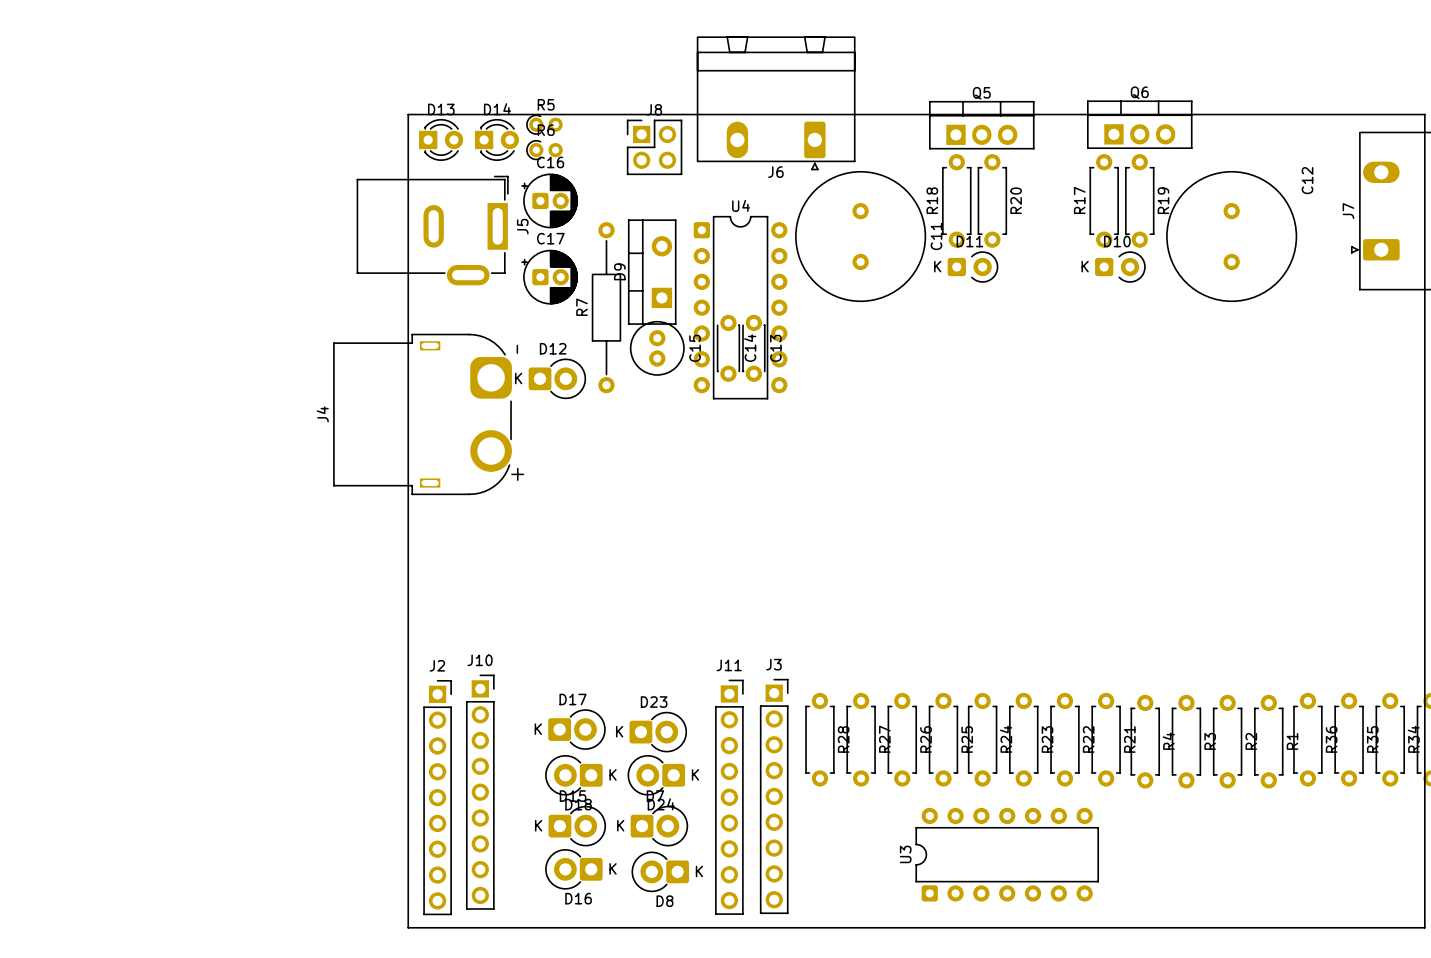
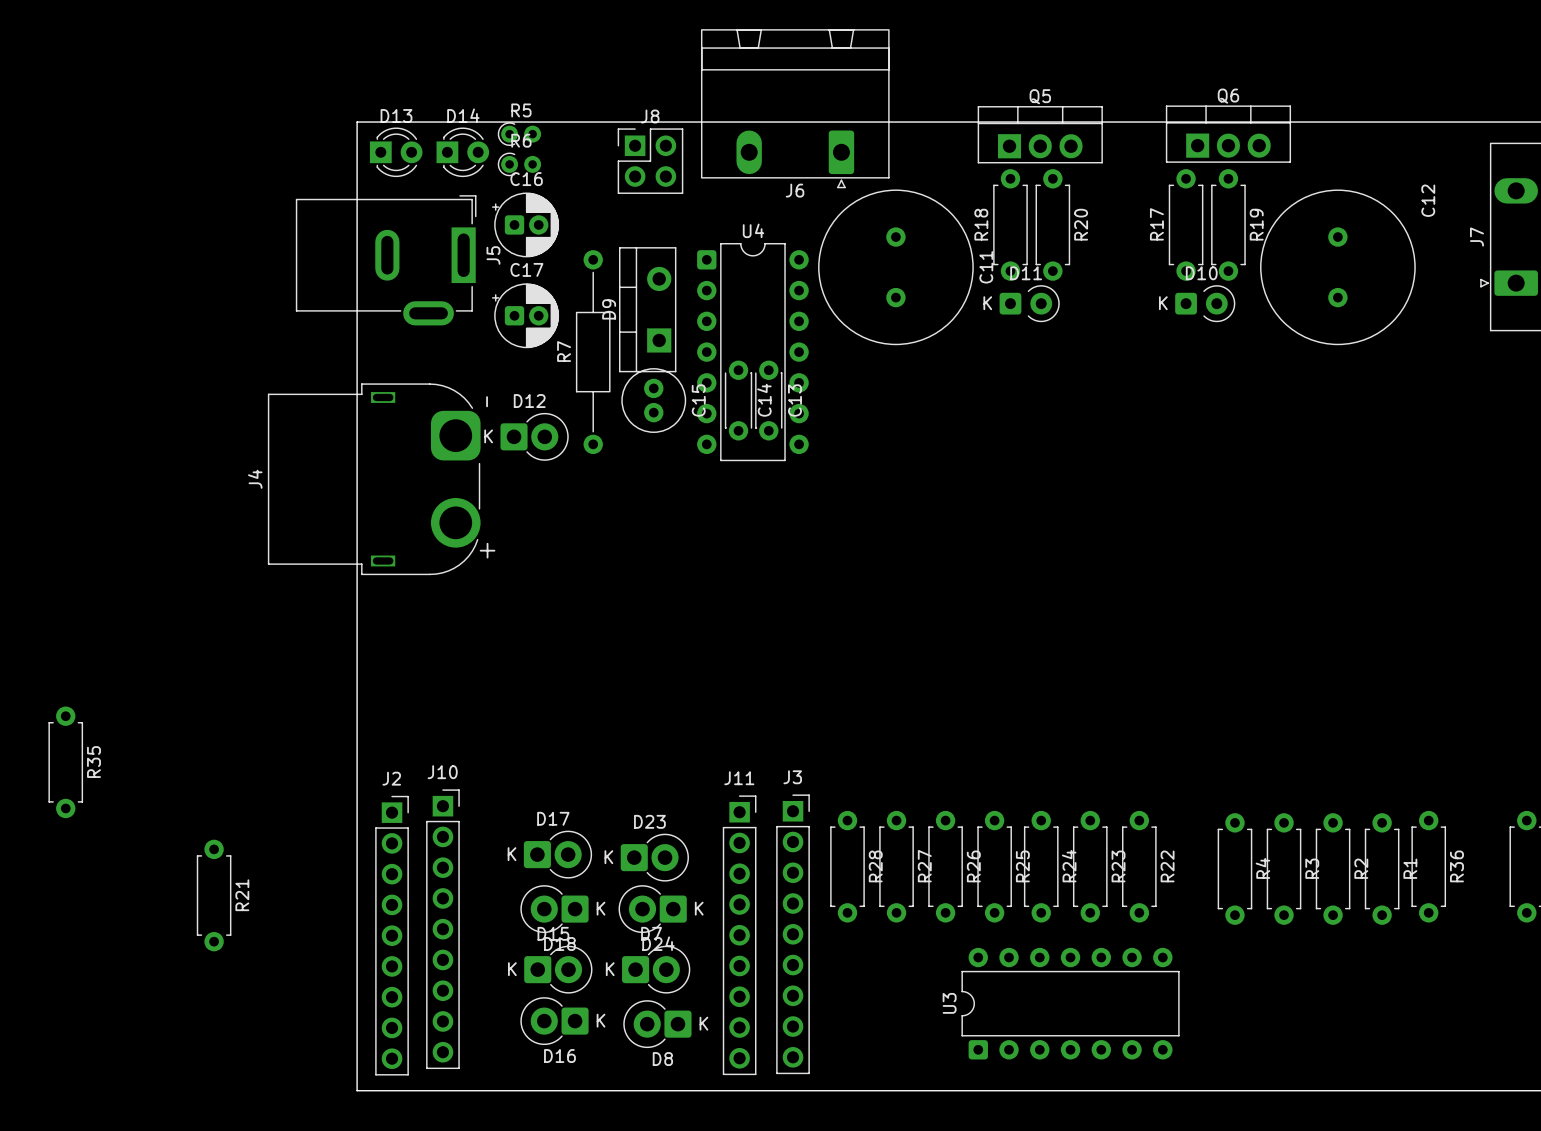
R21 position: (1106, 739) -> (214, 895)
R35 position: (1349, 739) -> (65, 762)

